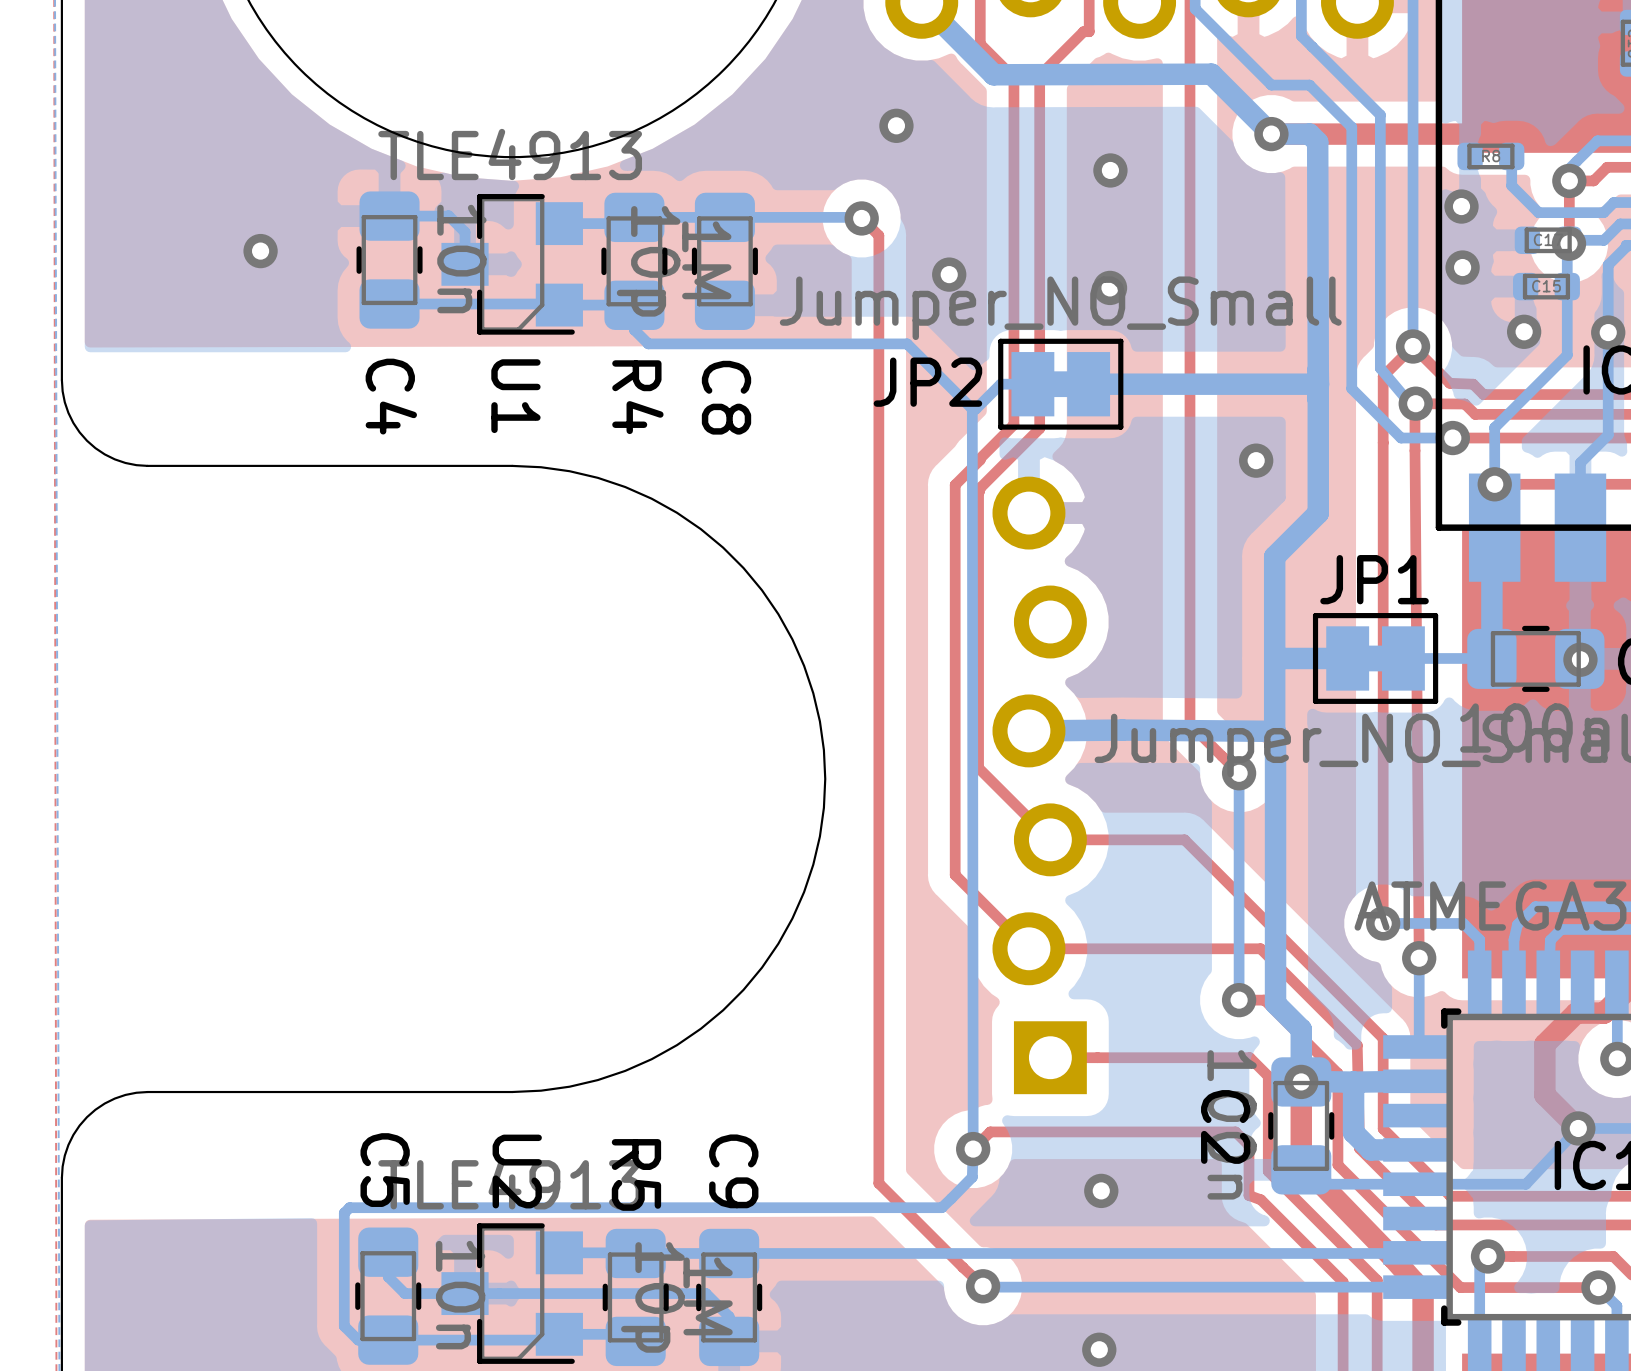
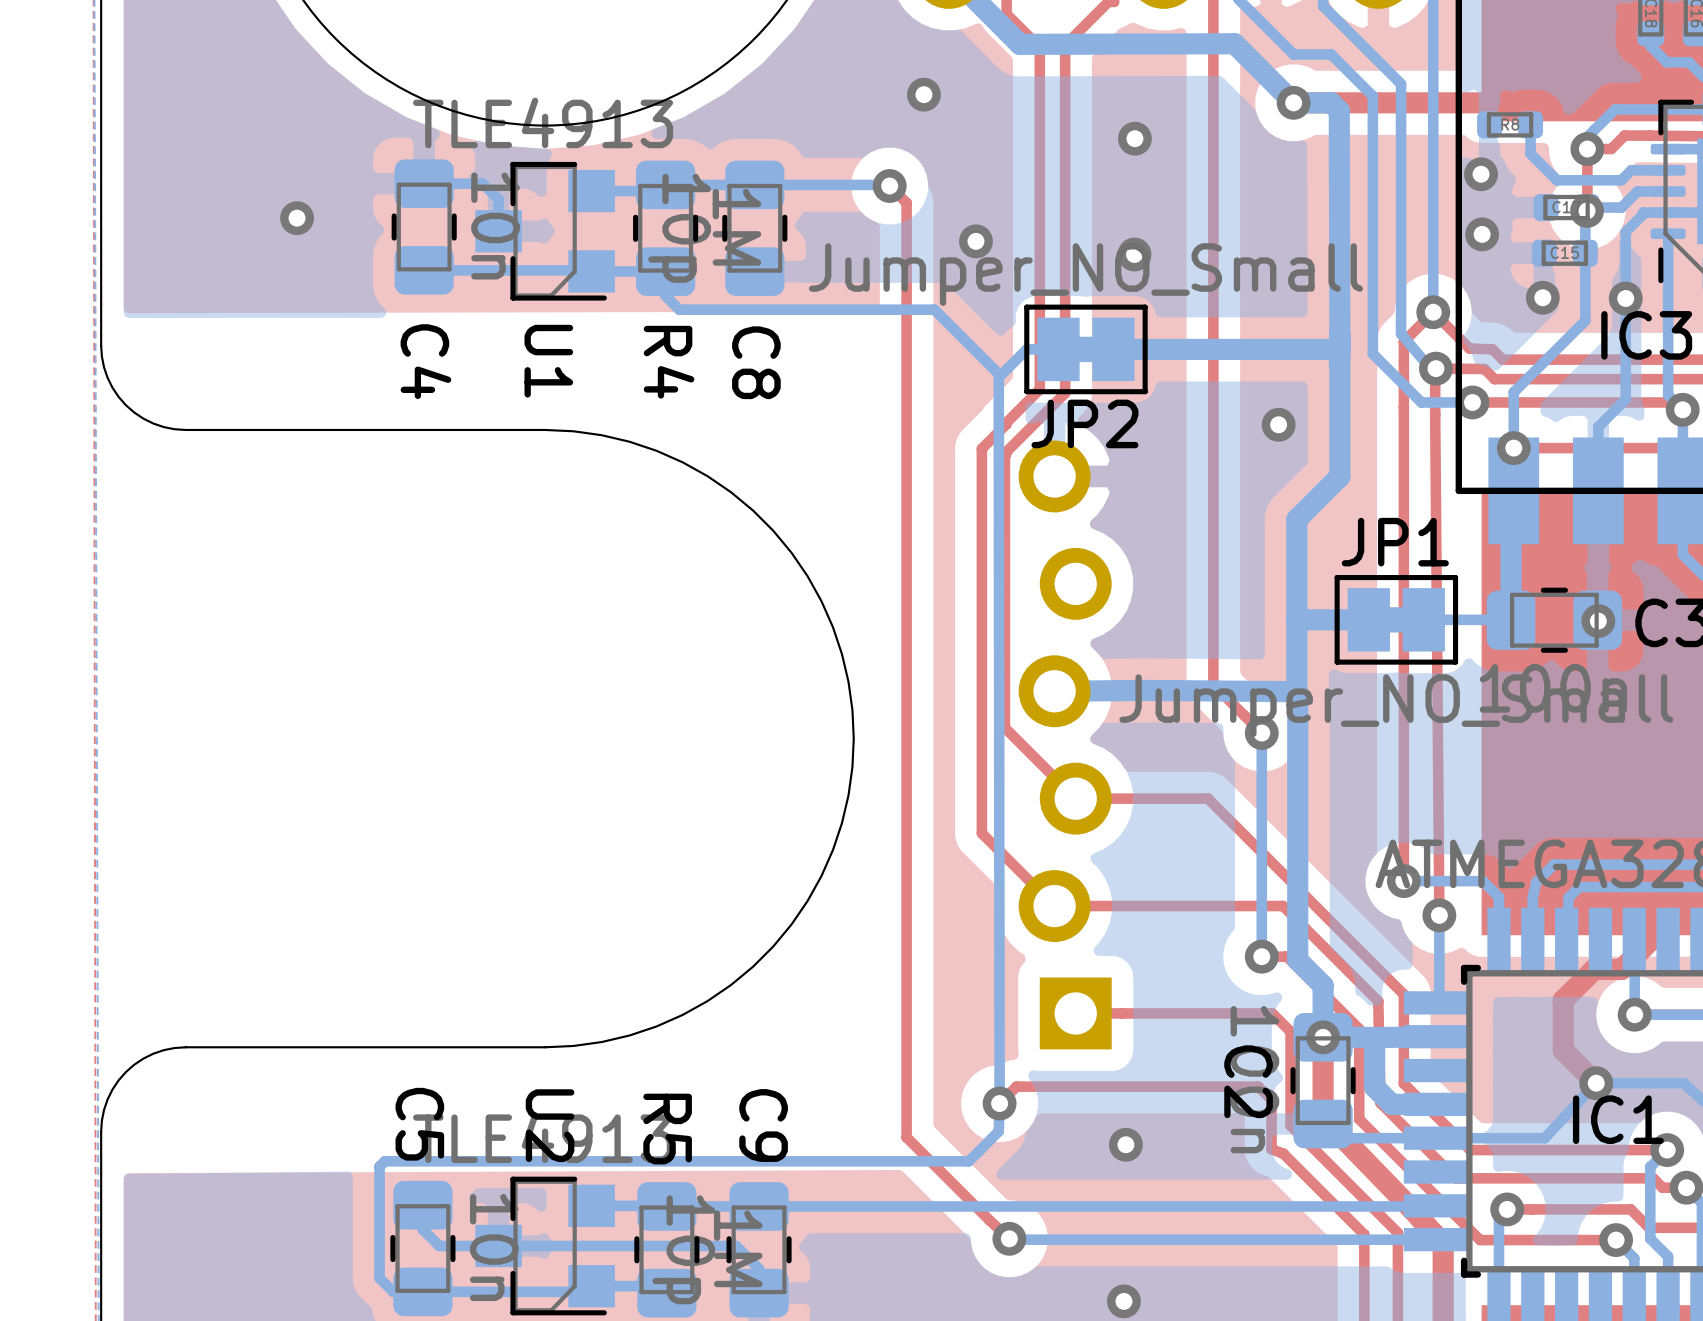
JP2 name position: JP2 (927, 382) -> JP2 (1084, 423)

